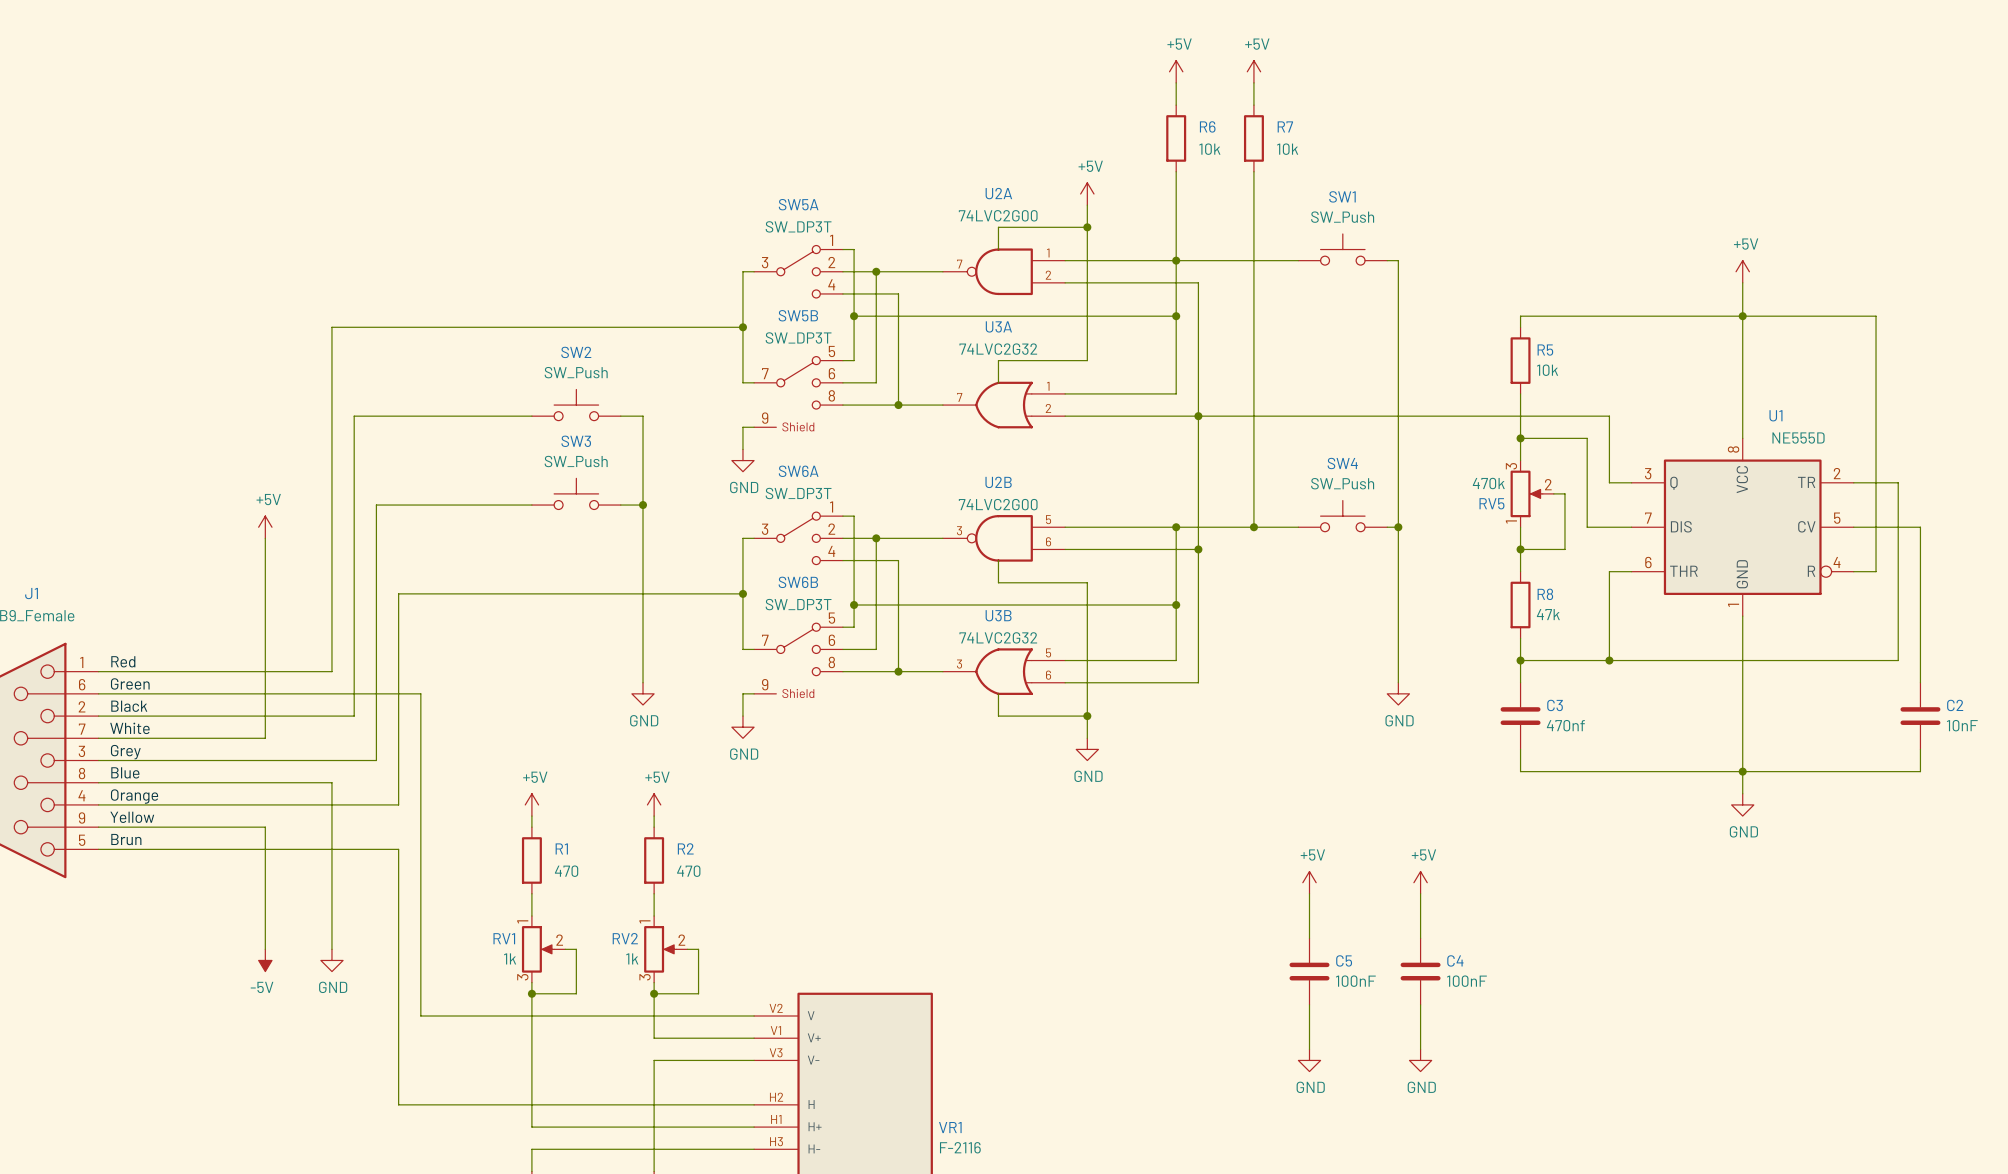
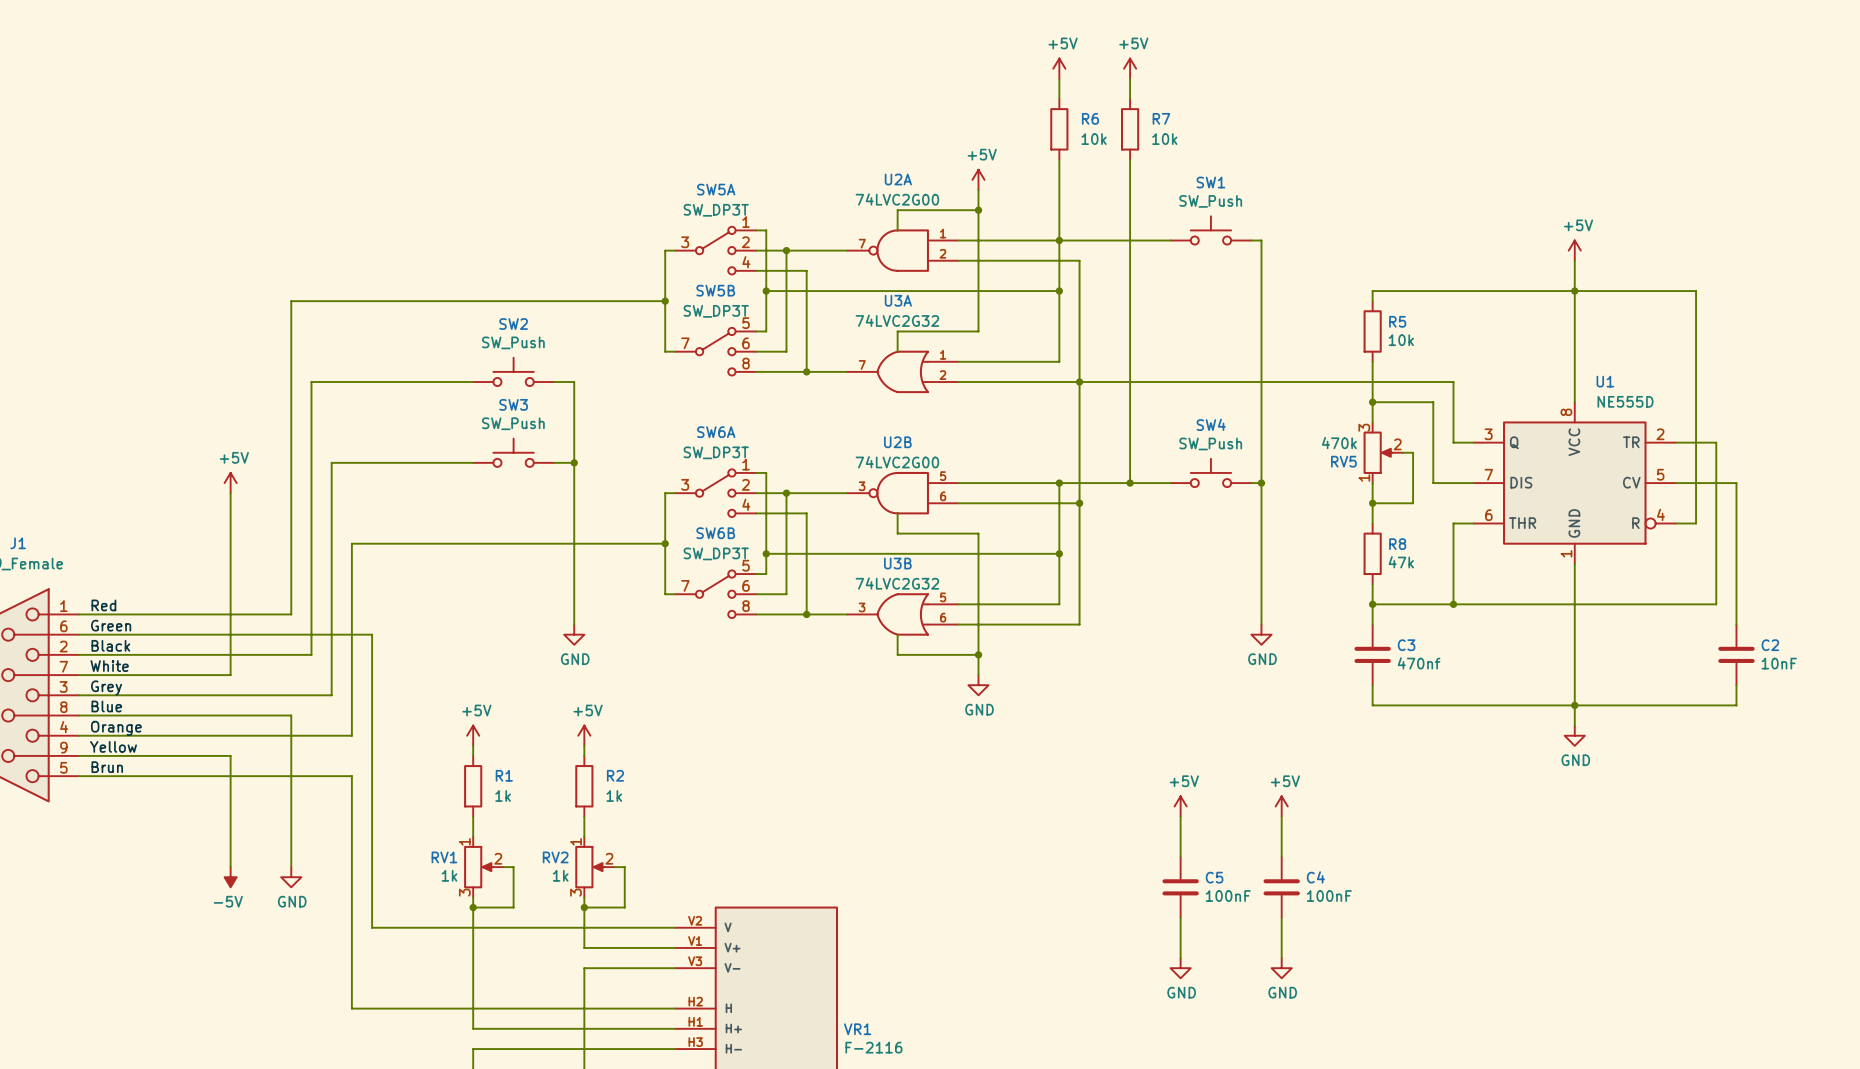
SW5B symbol: [754, 356, 843, 428] -> [675, 327, 757, 376]
wire: (754, 427) (742, 427) (742, 449) -> none
power symbol: GND (742, 460) -> none
SW6B symbol: [754, 623, 843, 694] -> [675, 570, 757, 619]
wire: (754, 693) (742, 693) (742, 716) -> none
power symbol: GND (742, 727) -> none
R1 value: 470 (566, 871) -> 1k (503, 795)
R2 value: 470 (688, 871) -> 1k (614, 795)

